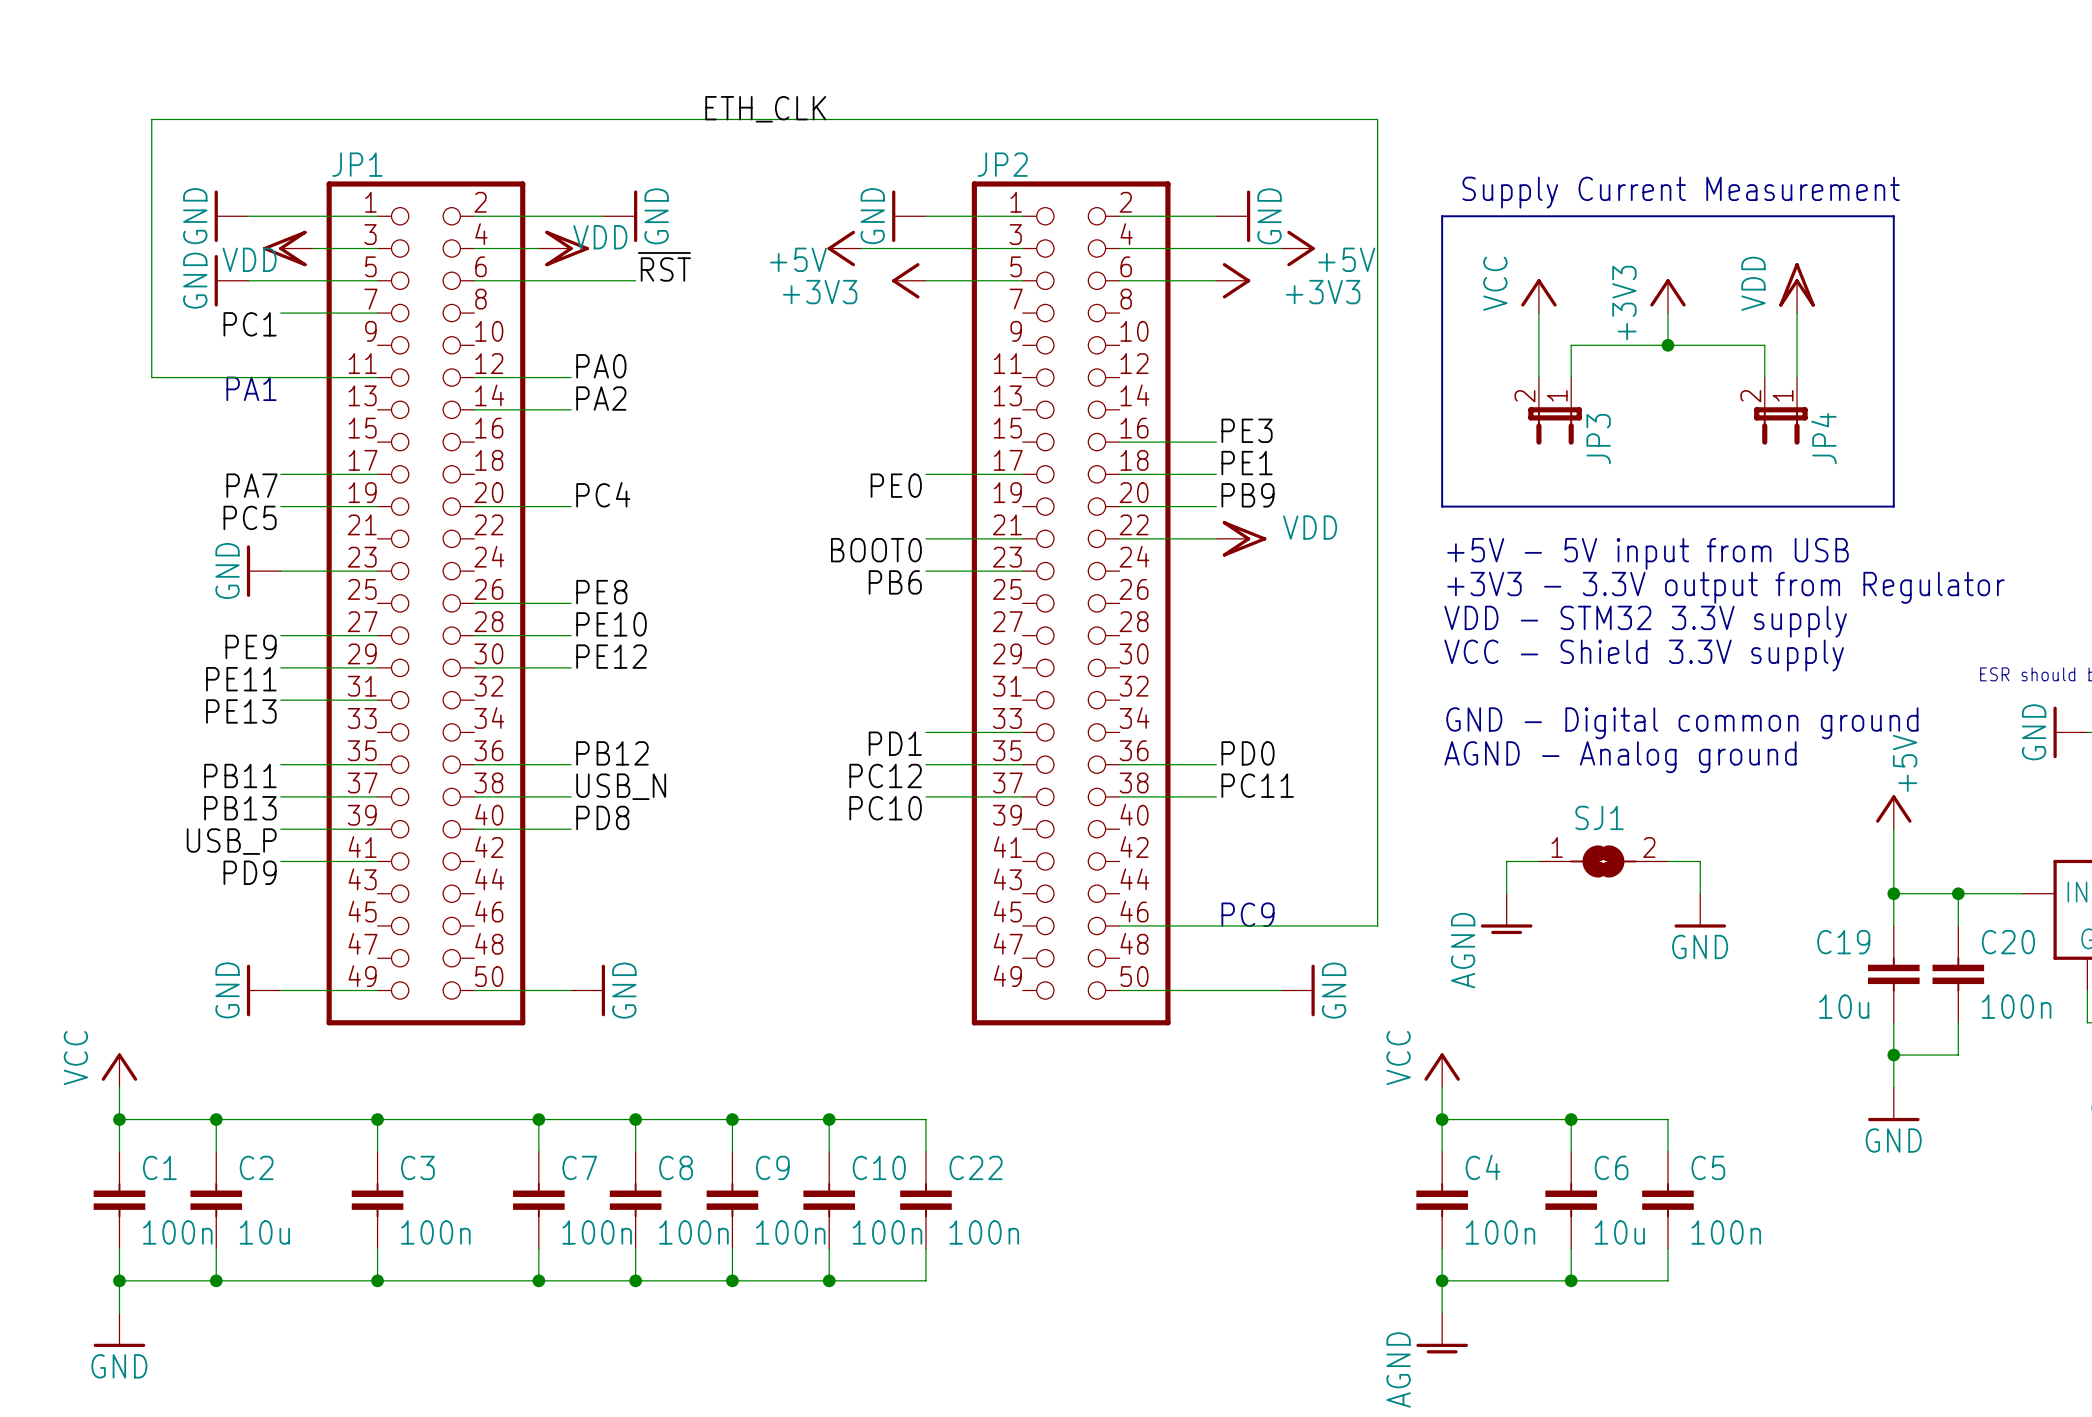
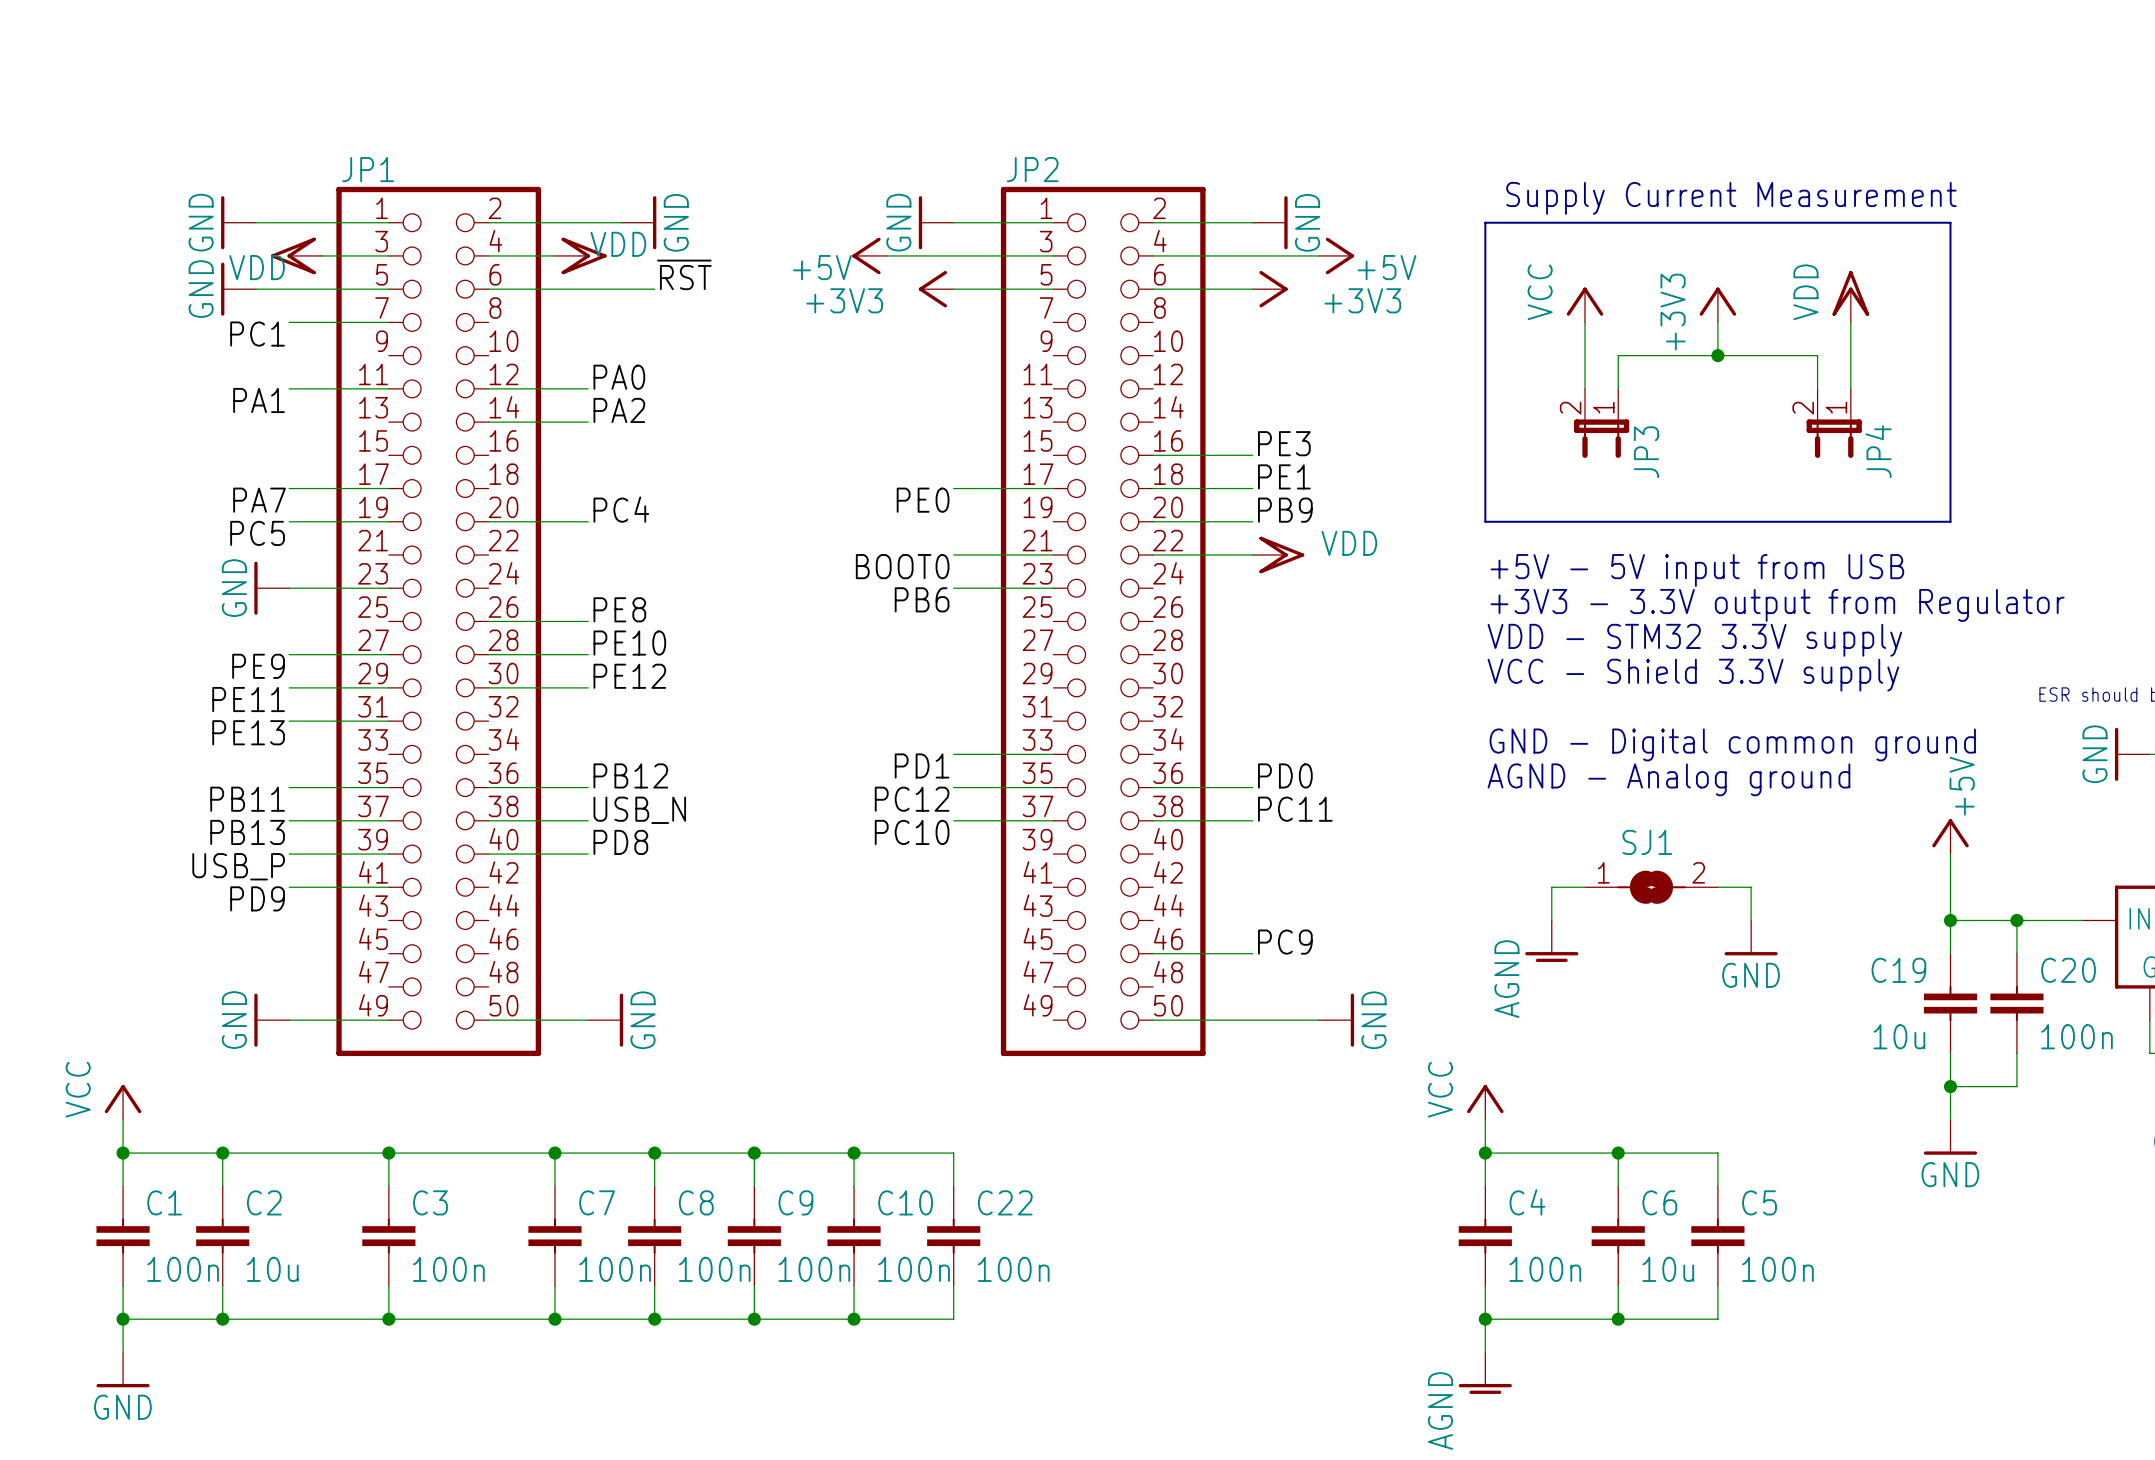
label: ETH_CLK (765, 109) -> none
wire: (280, 377) (151, 377) (151, 119) (1377, 119) (1377, 925) (1216, 925) -> none
text: PA1 (251, 388) -> none
label: none -> PA1 (259, 400)
text: PC9 (1248, 914) -> none
label: none -> PC9 (1285, 942)

